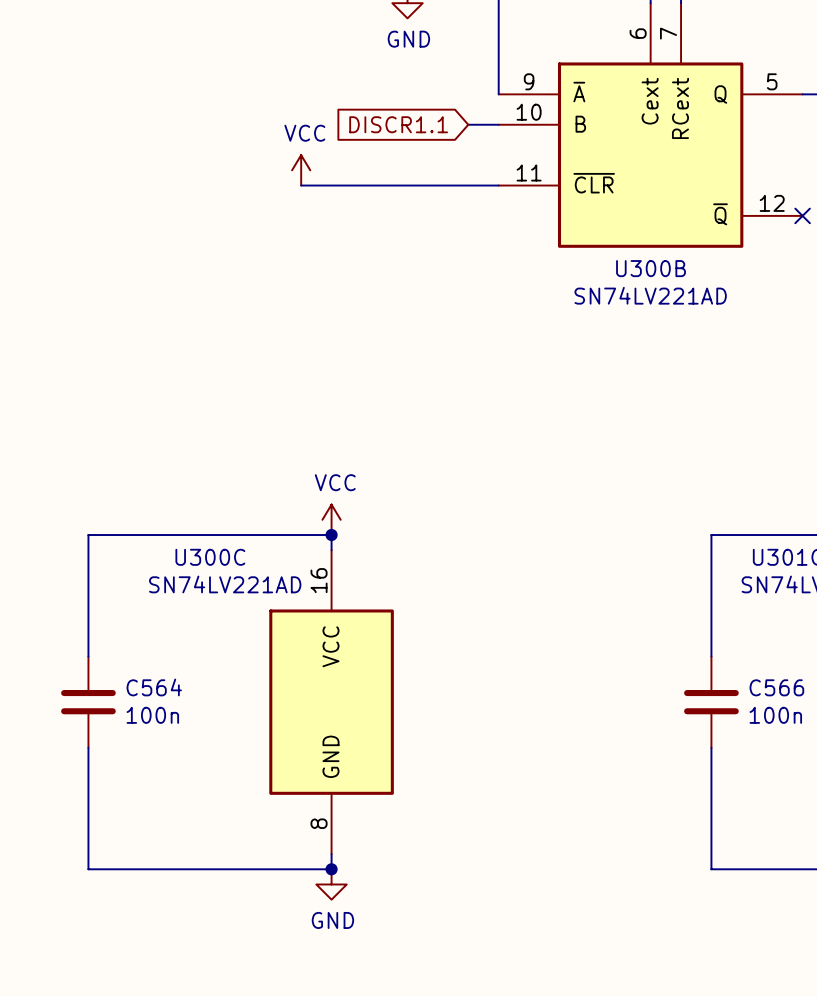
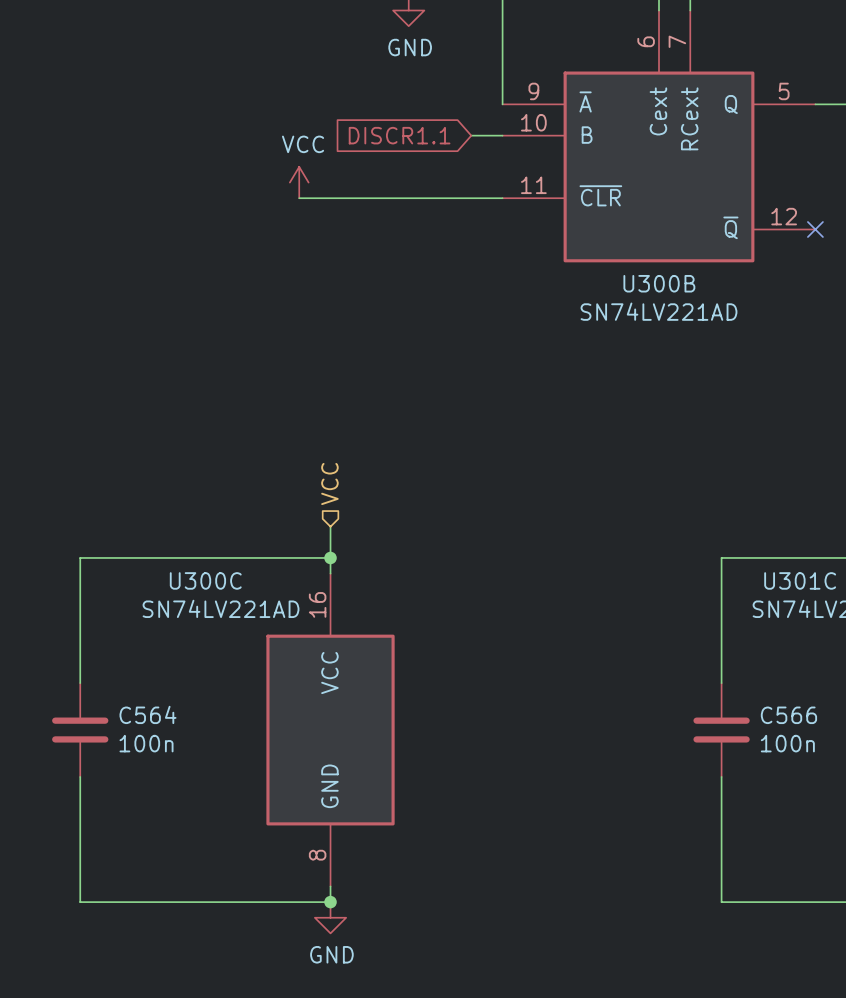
hierarchical label: none -> VCC (329, 483)
power symbol: VCC (331, 519) -> none

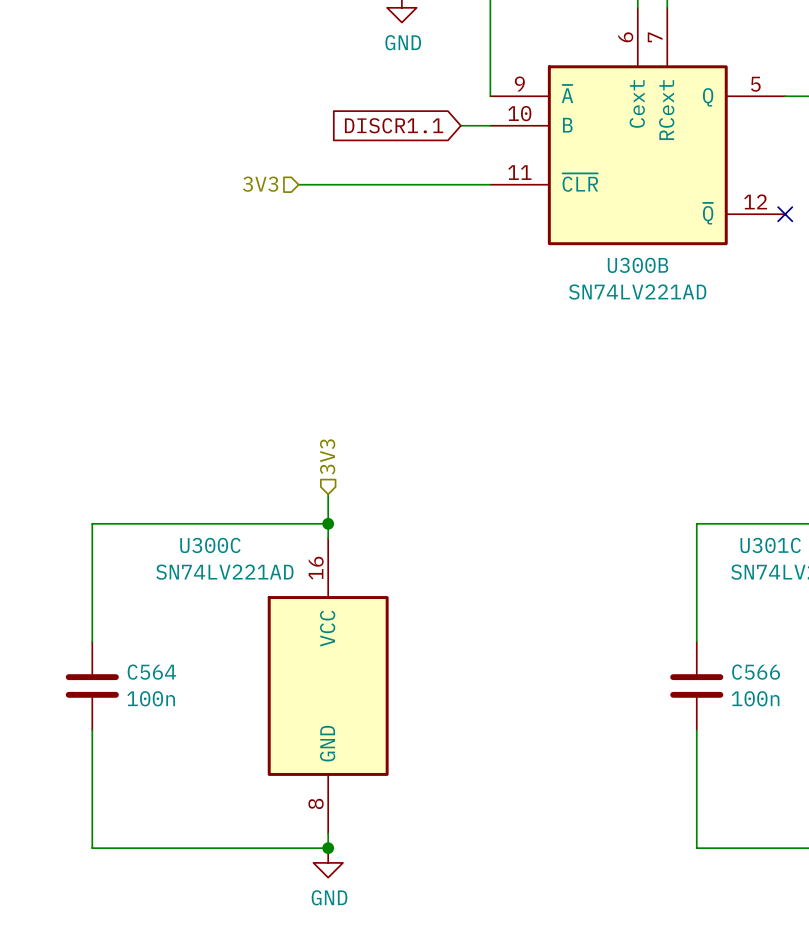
power symbol: VCC (299, 182) -> none
hierarchical label: none -> 3V3 (260, 184)
hierarchical label: VCC (329, 483) -> 3V3 (327, 456)

